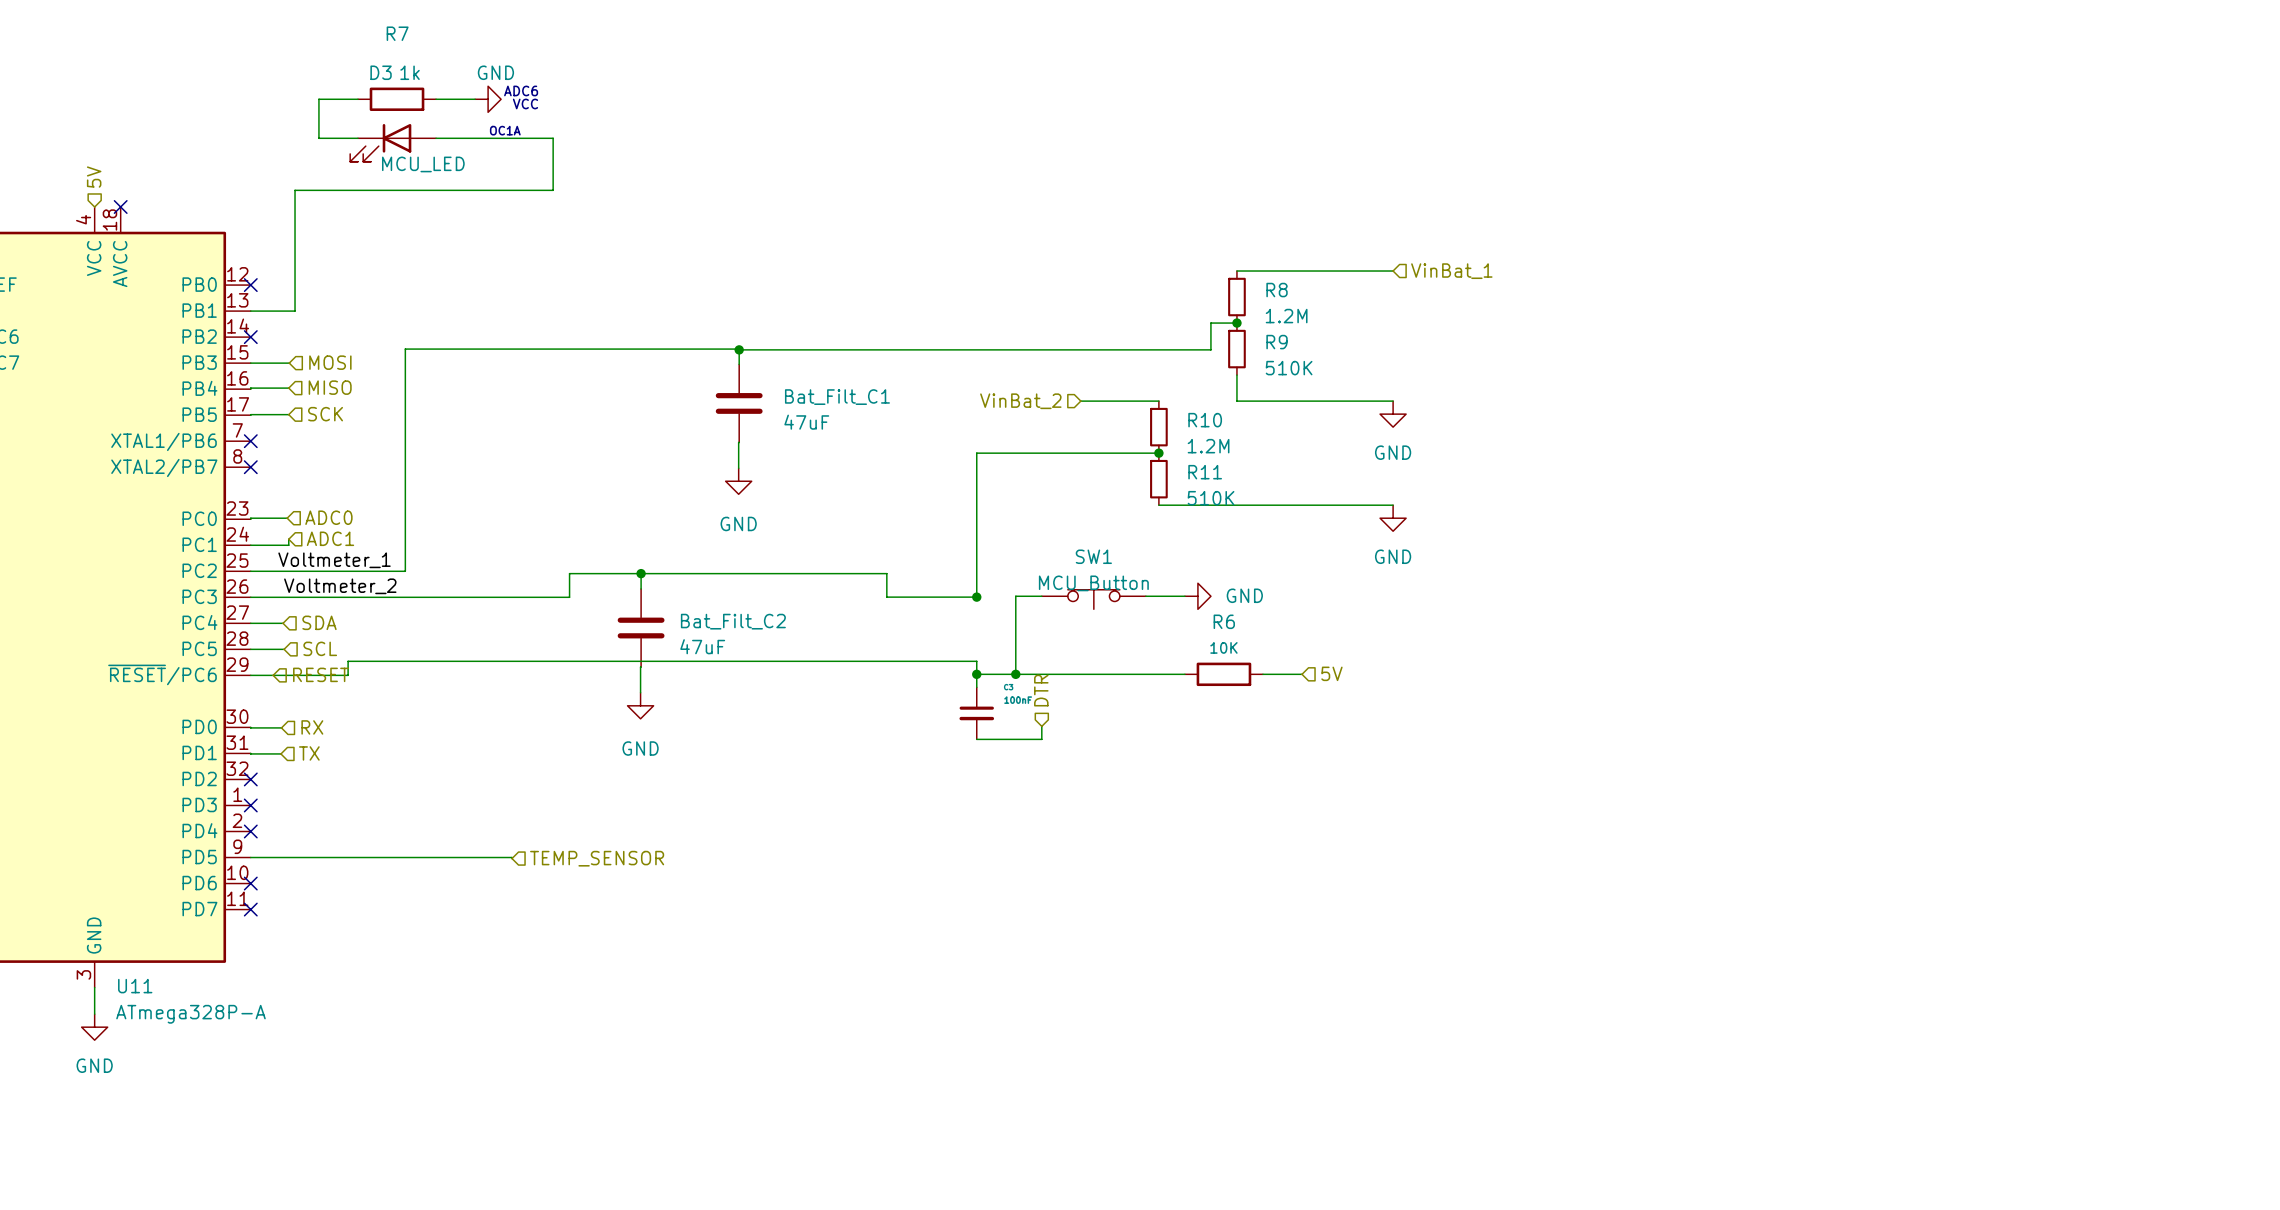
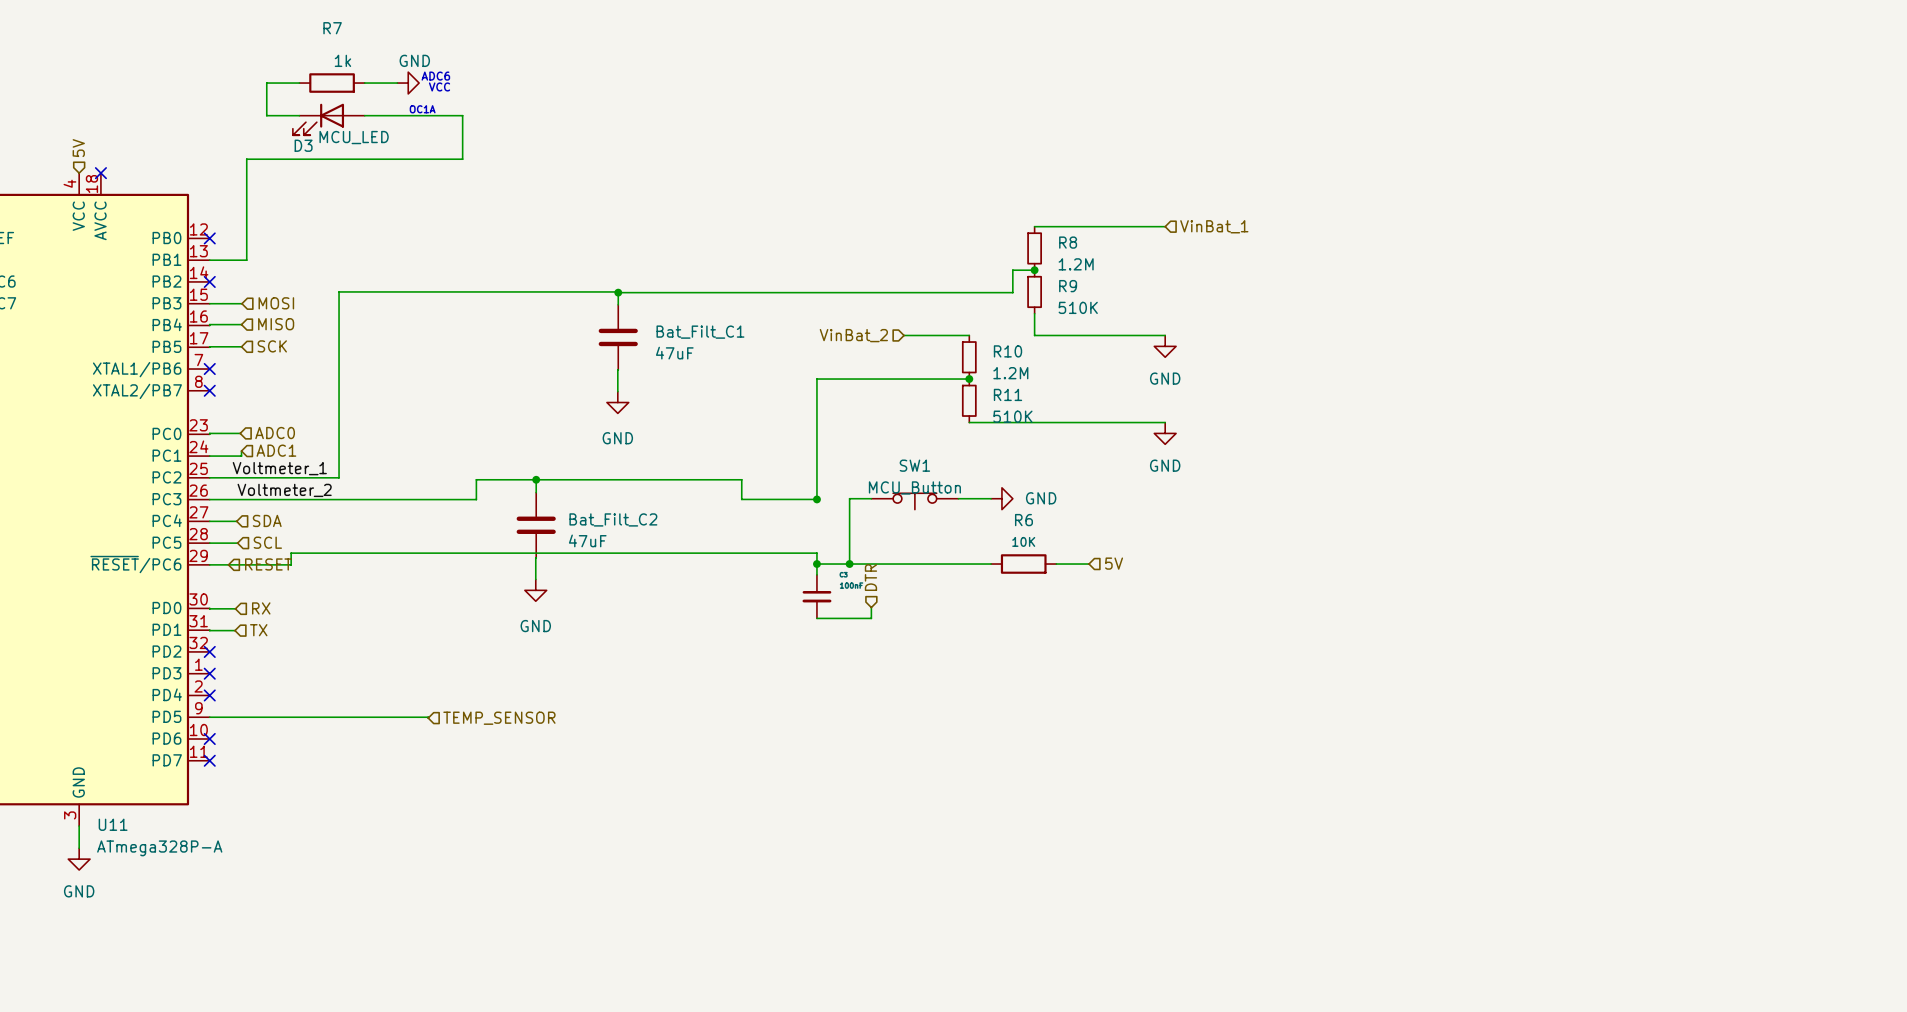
D3 name position: D3 (381, 72) -> D3 (303, 145)

